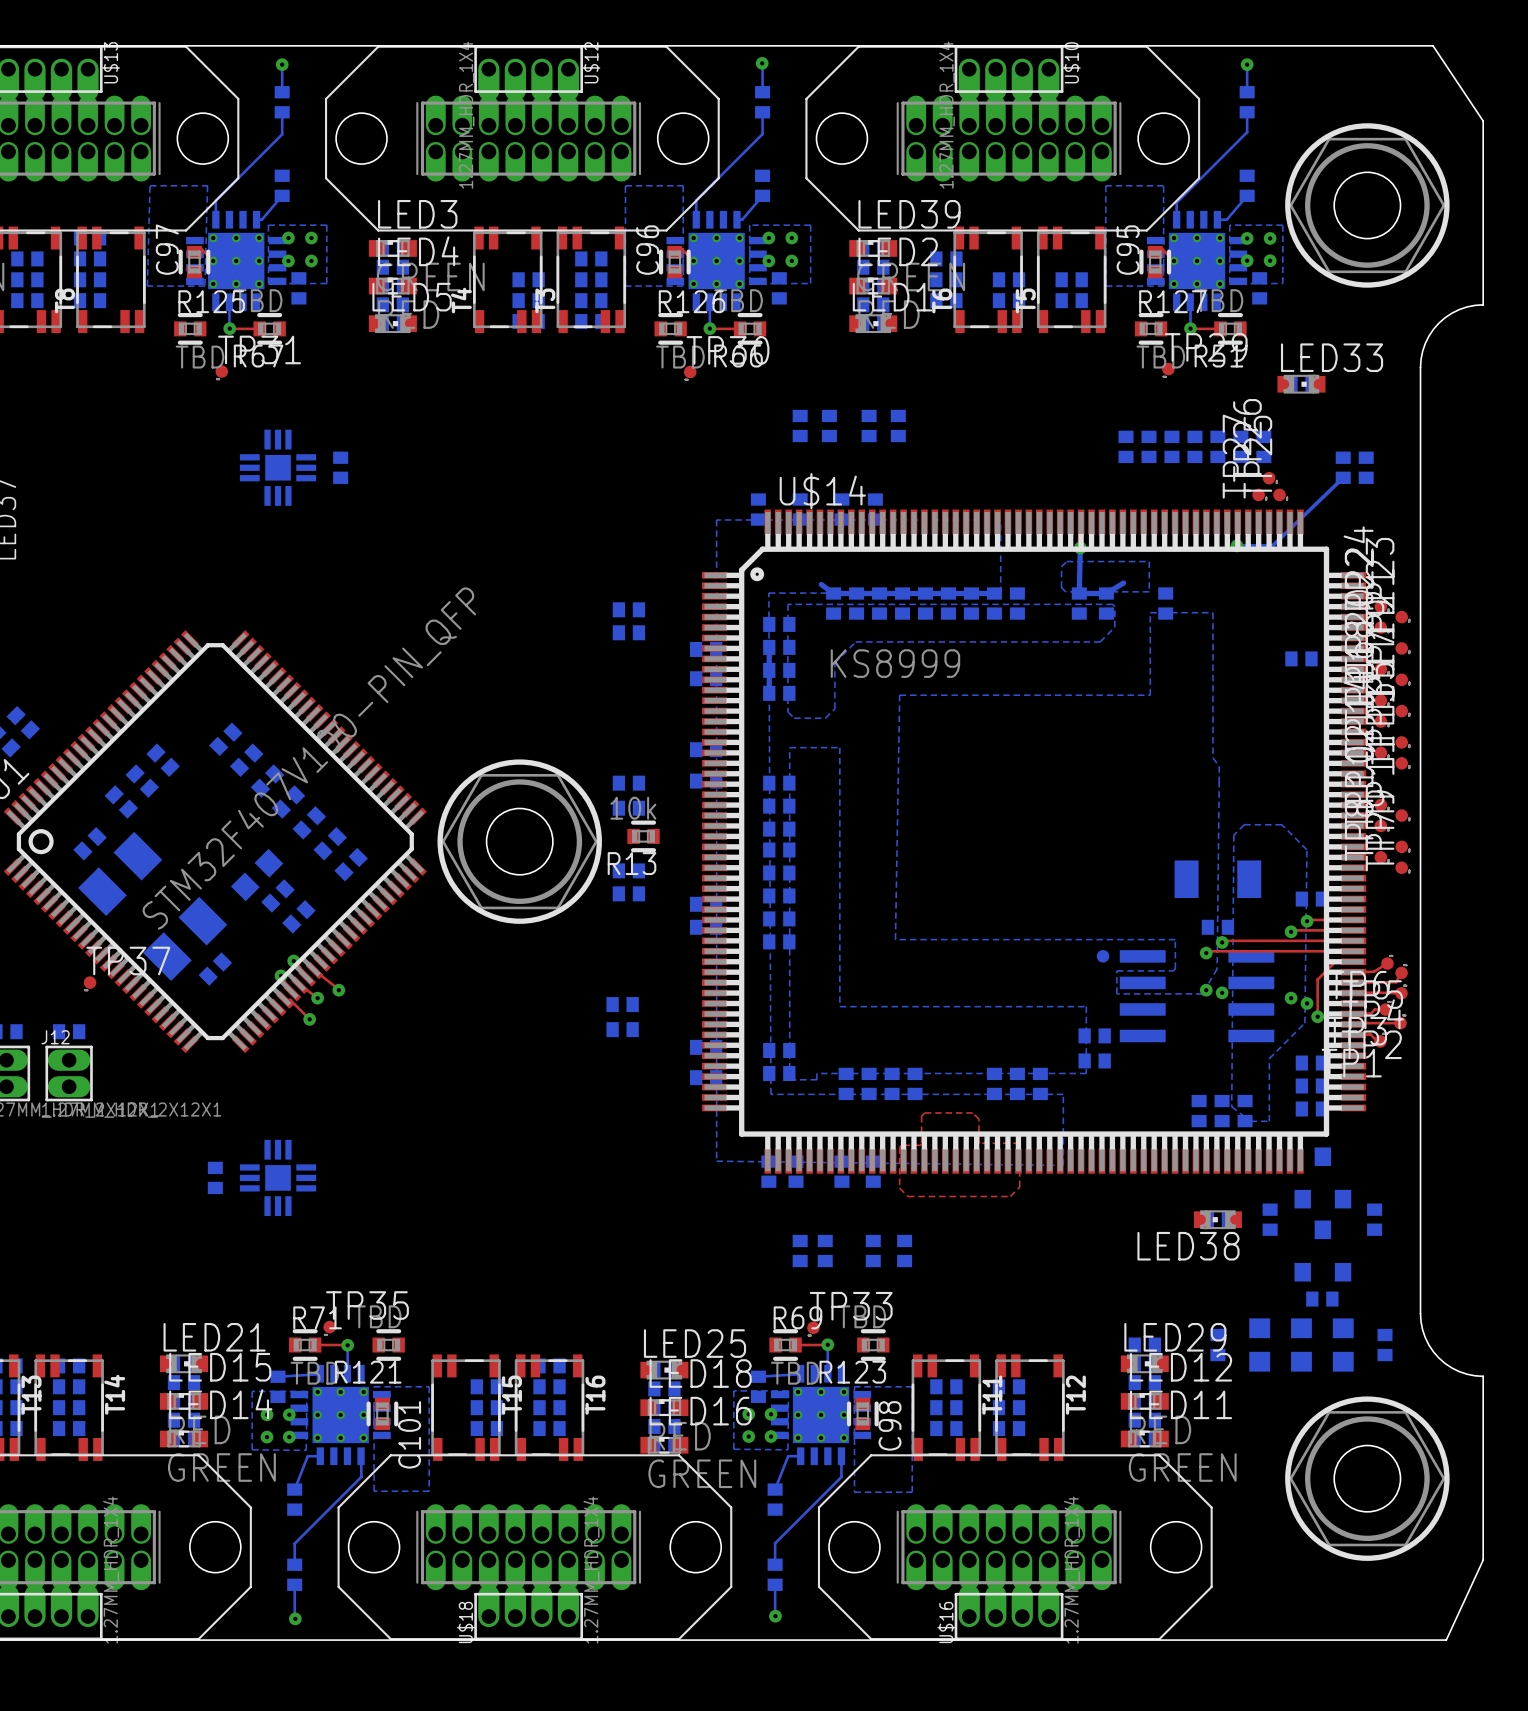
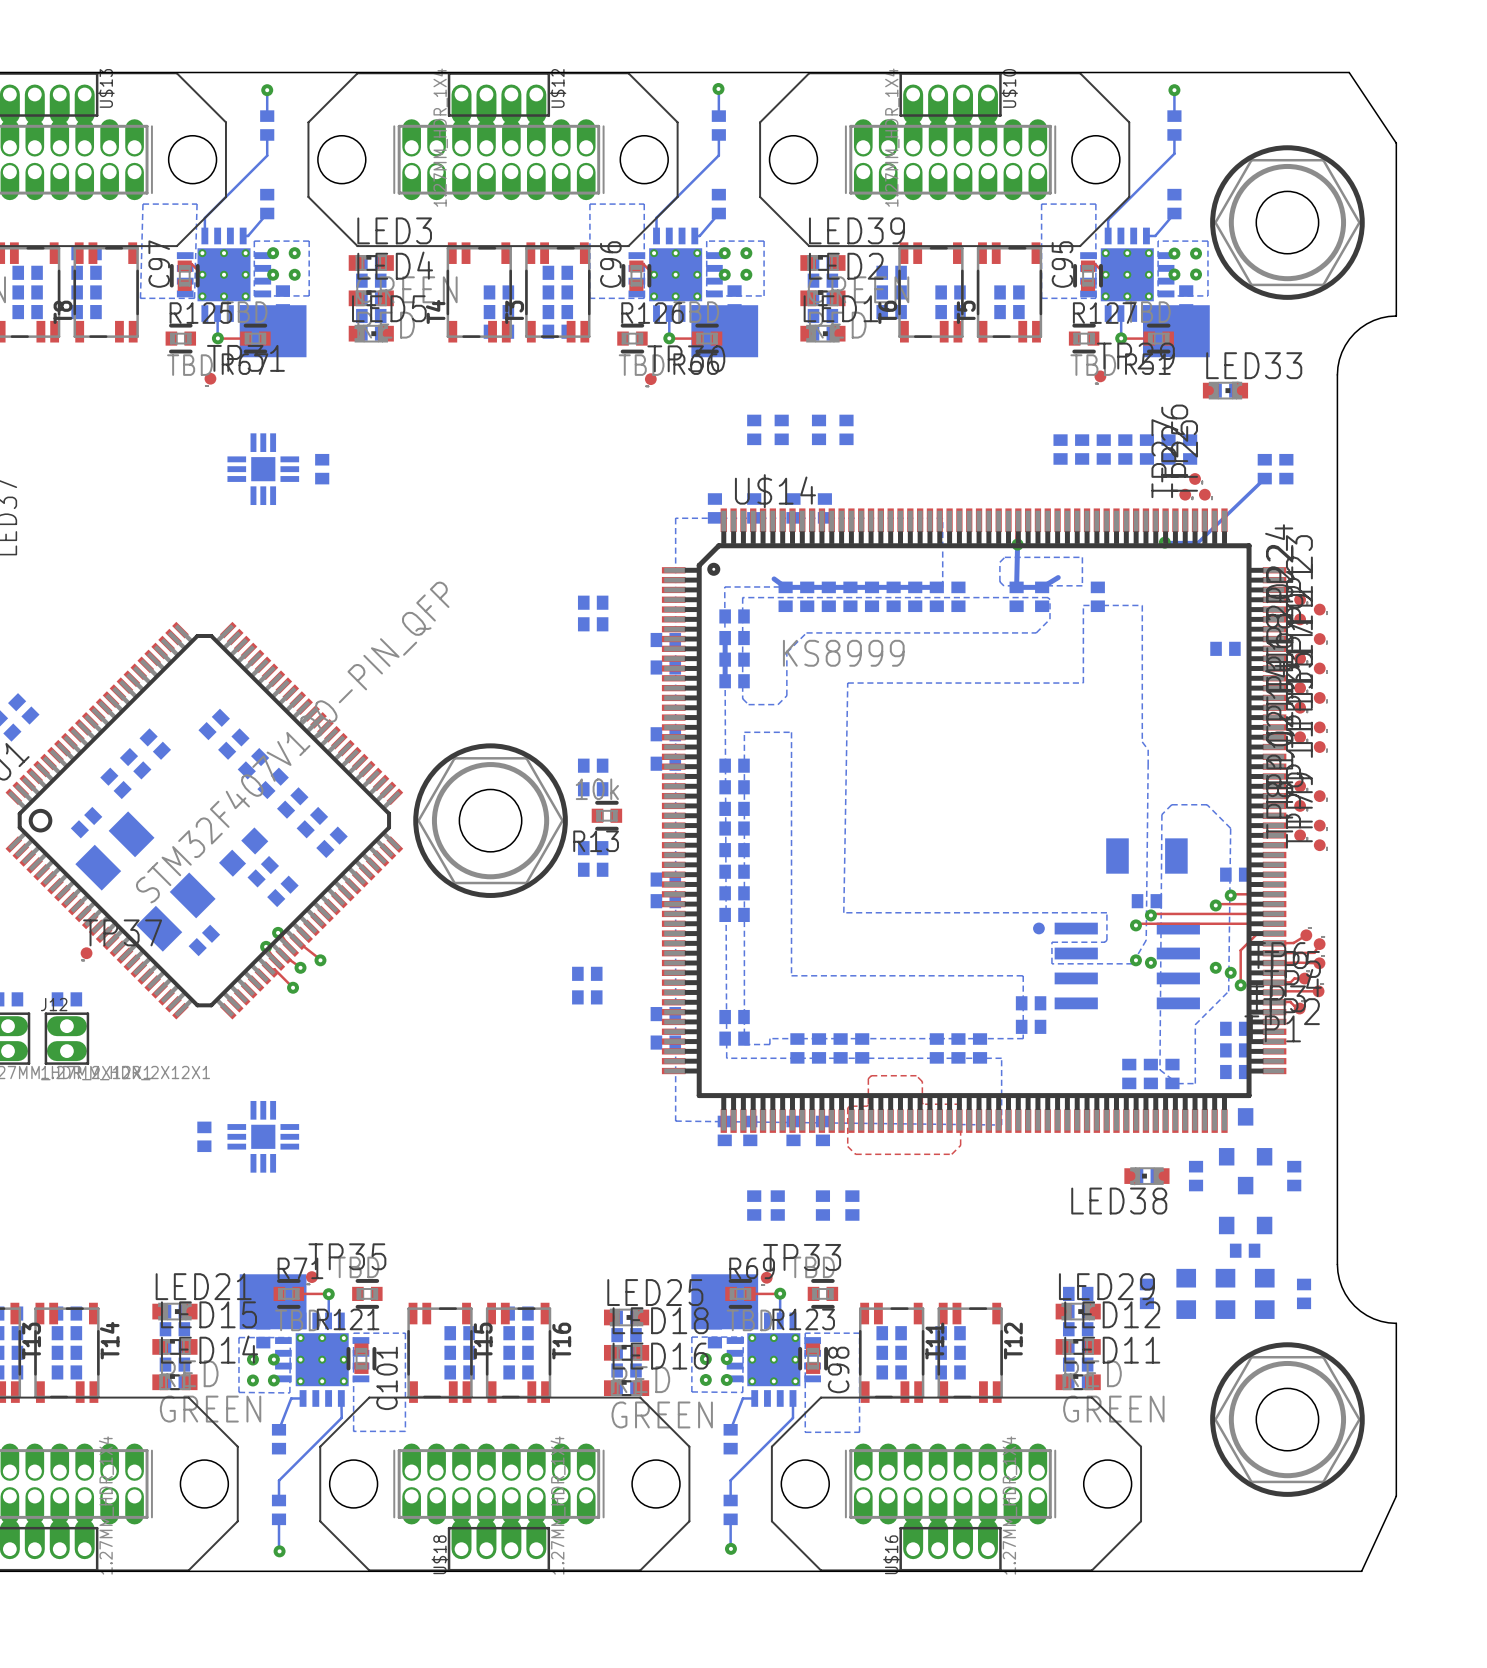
drawing: none -> [239, 305, 307, 358]
drawing: none -> [691, 305, 759, 358]
drawing: none -> [1143, 305, 1210, 358]
drawing: none -> [239, 1274, 307, 1330]
drawing: none -> [691, 1274, 759, 1330]

